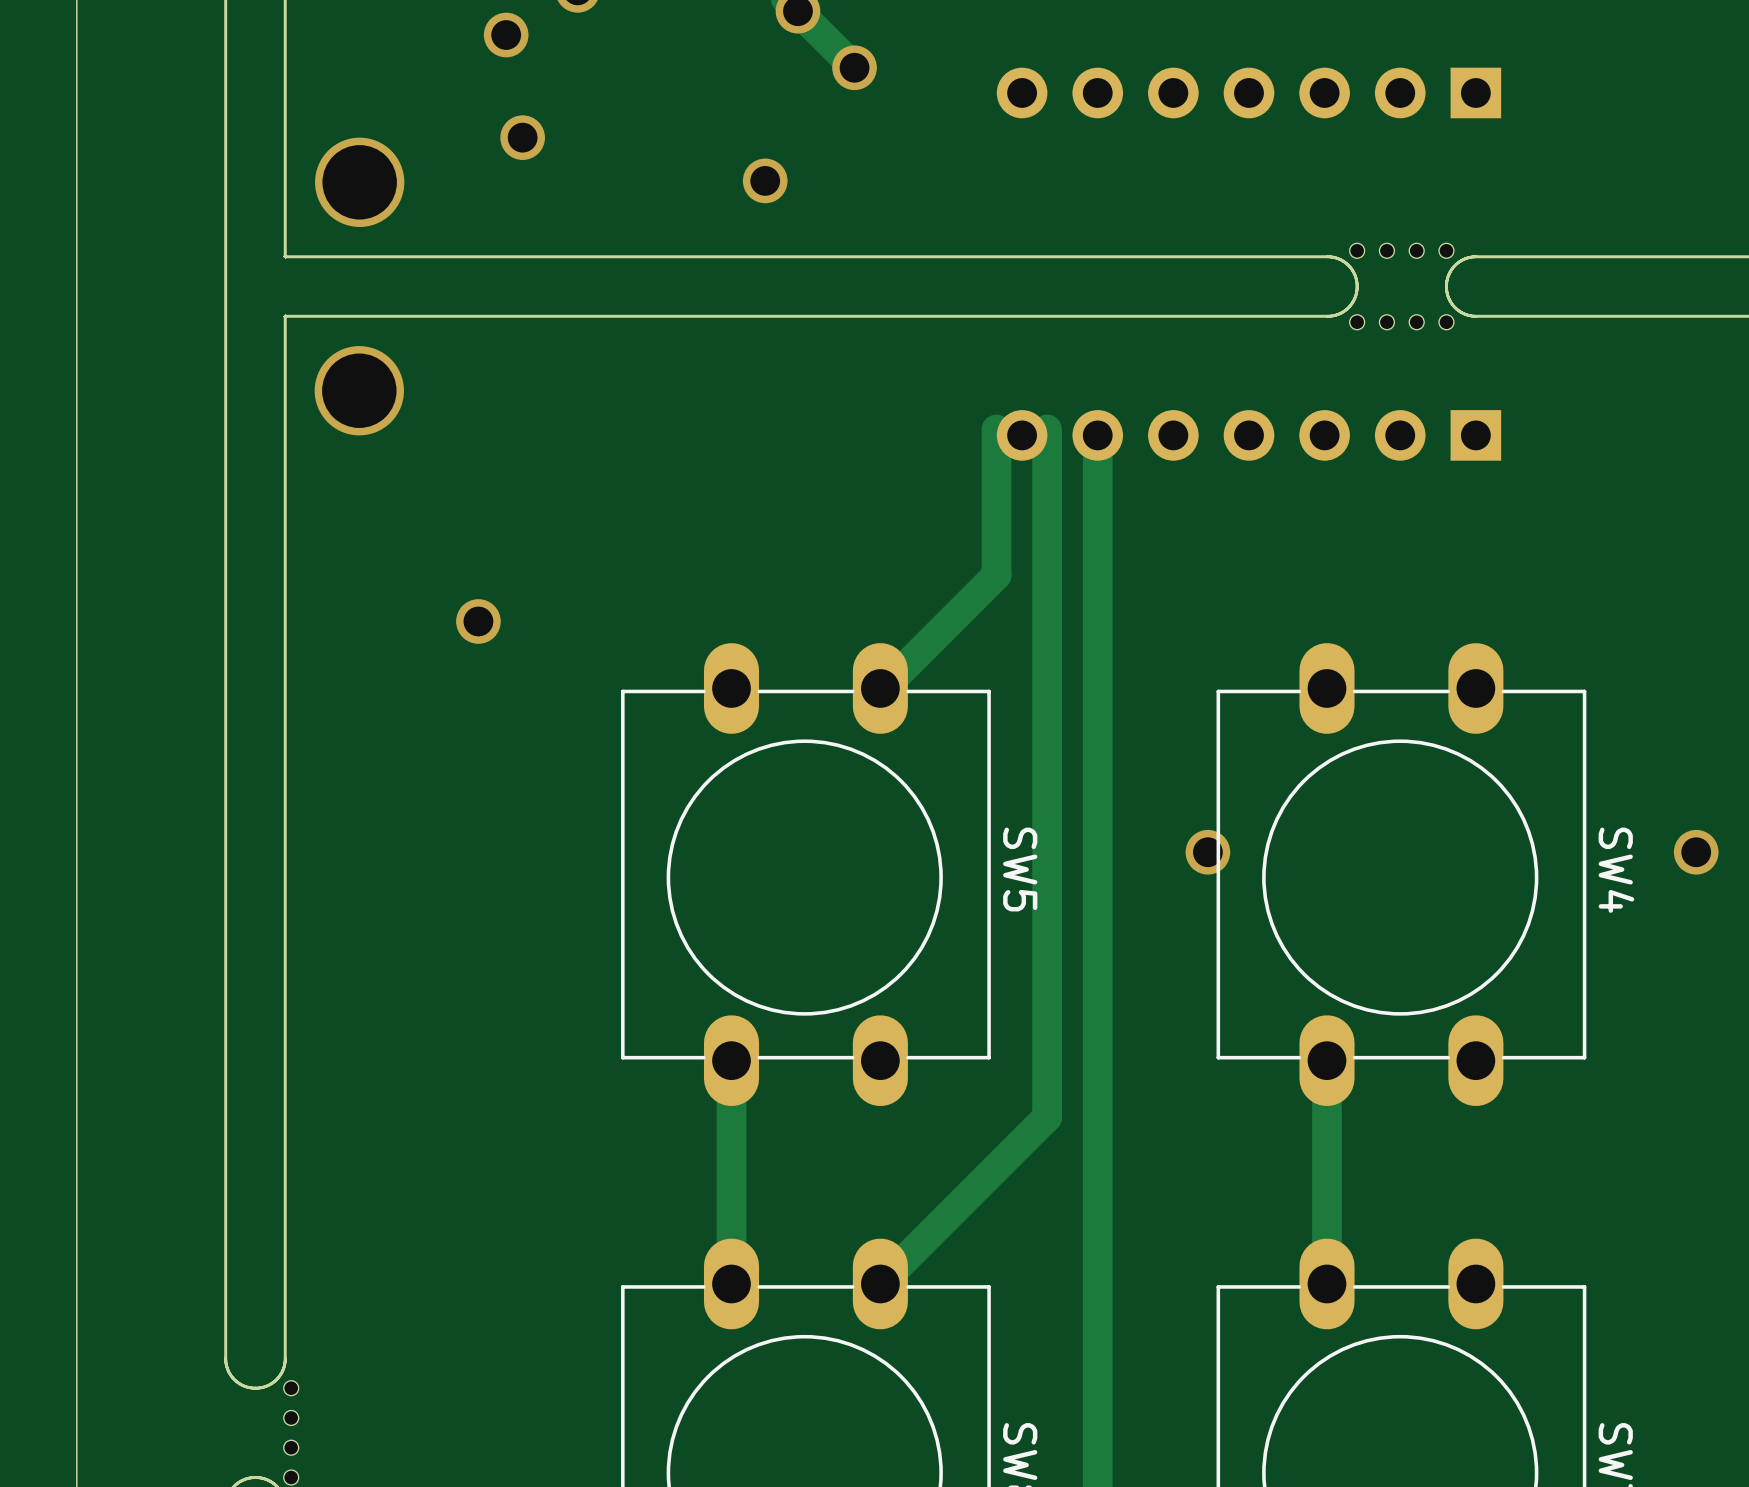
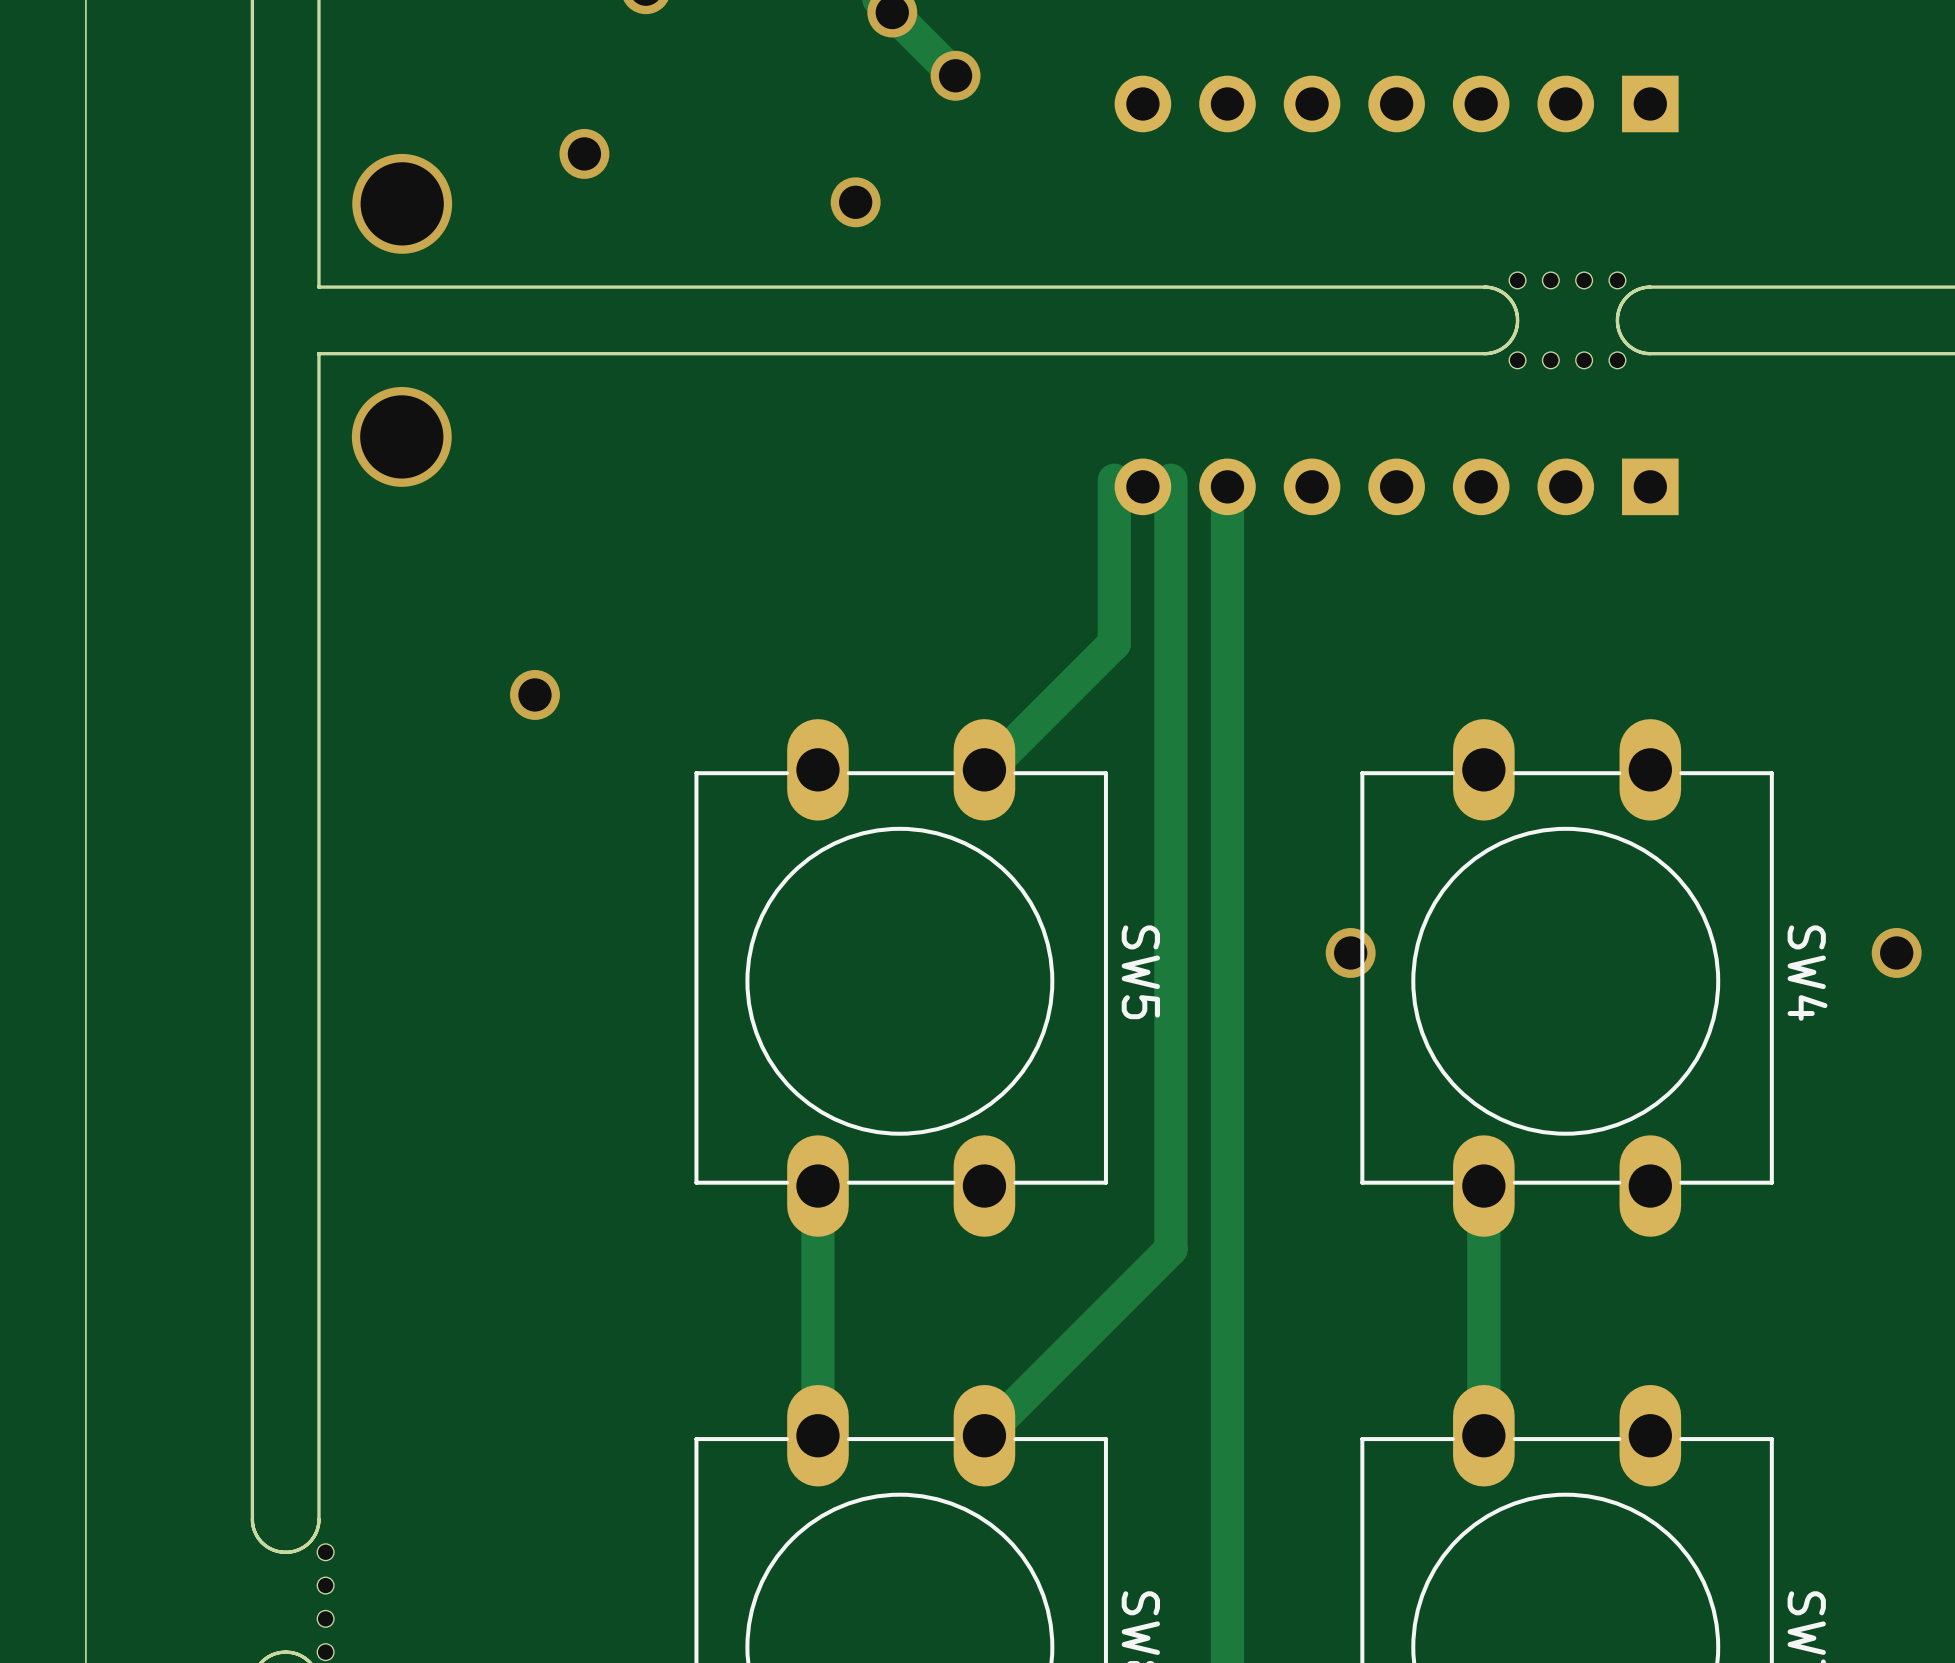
via: (506, 35) -> none

